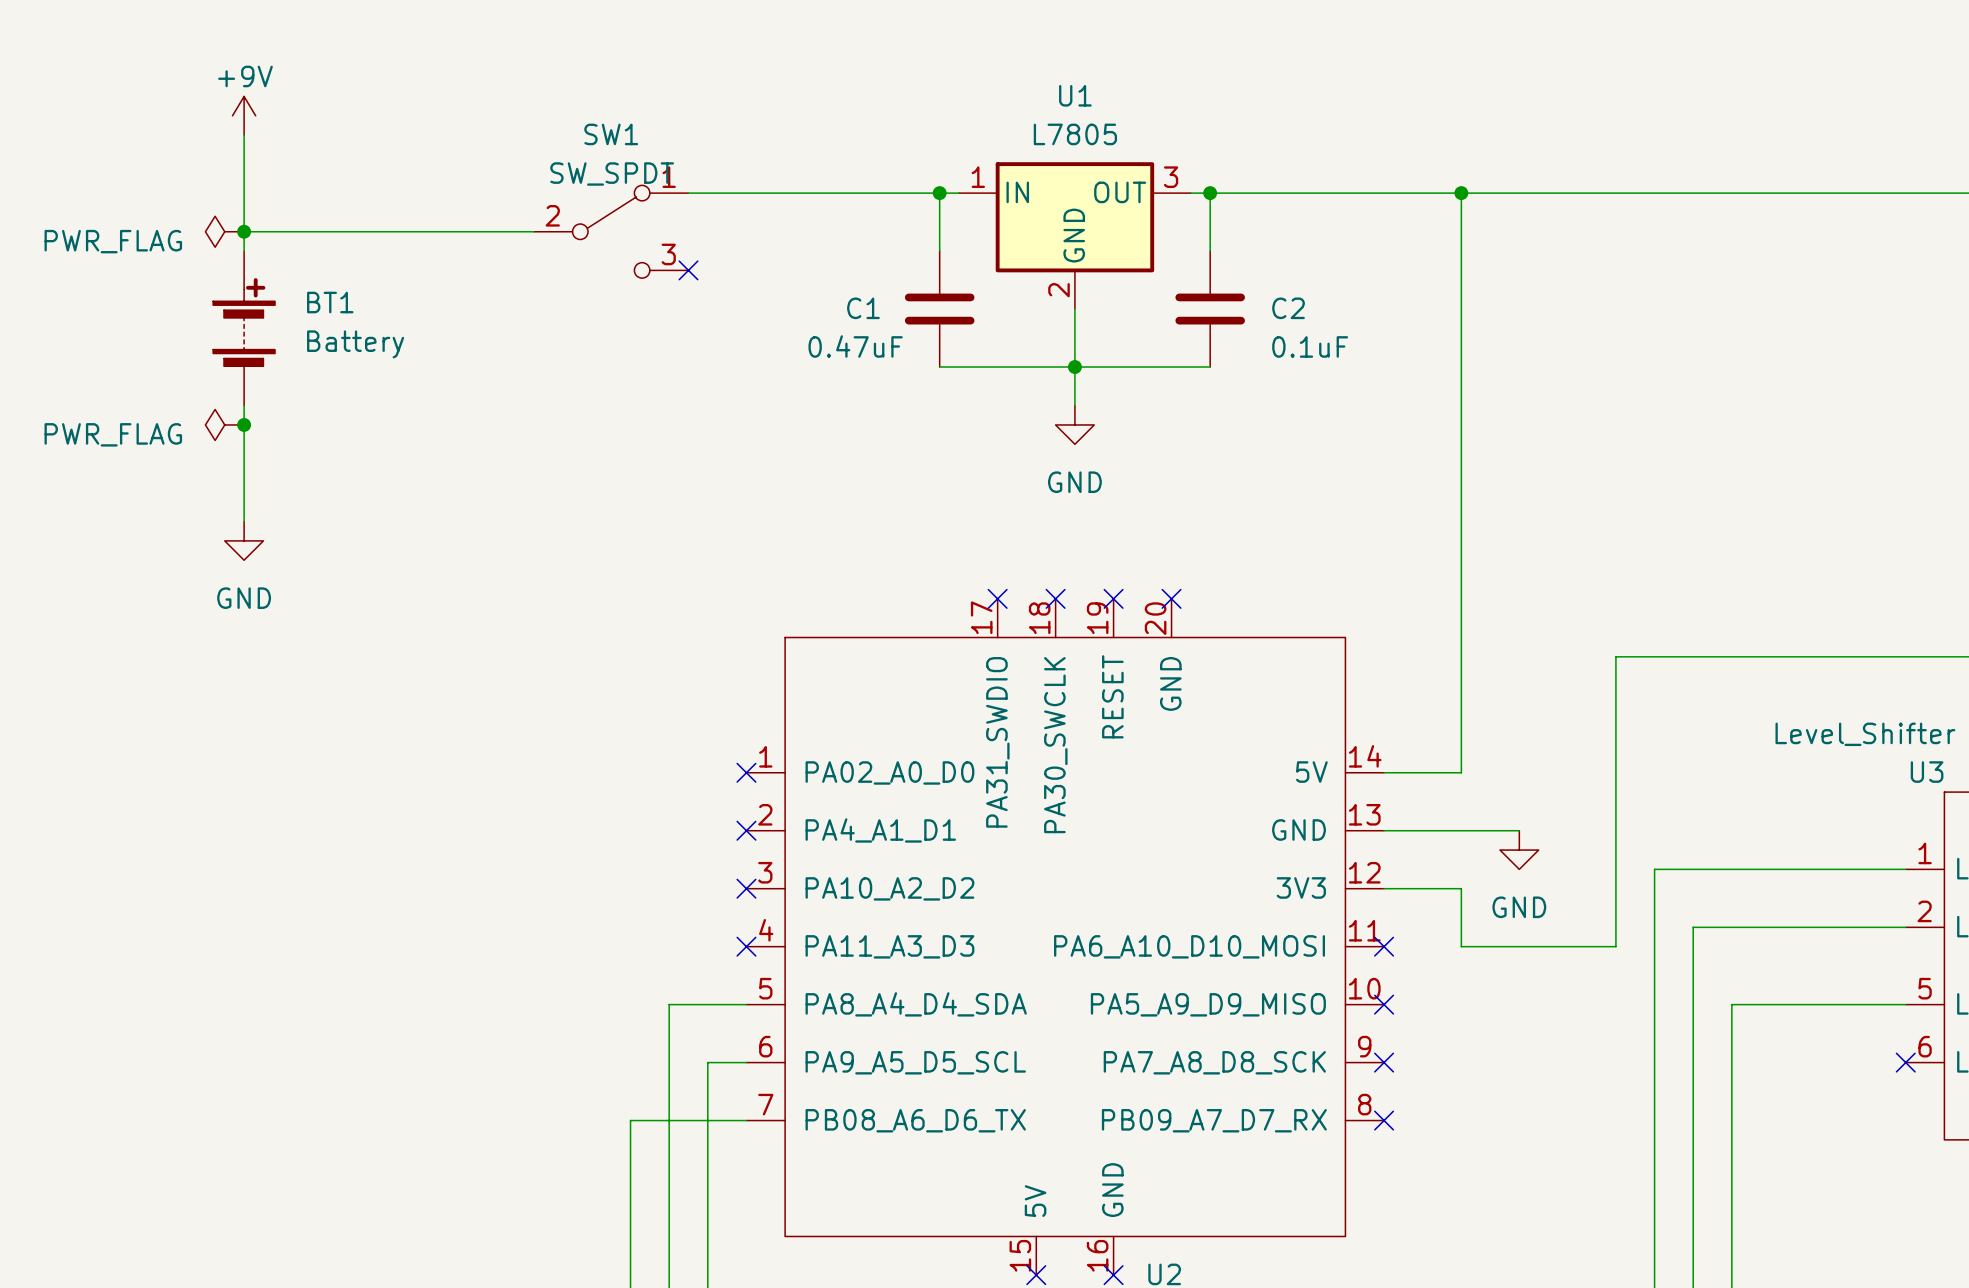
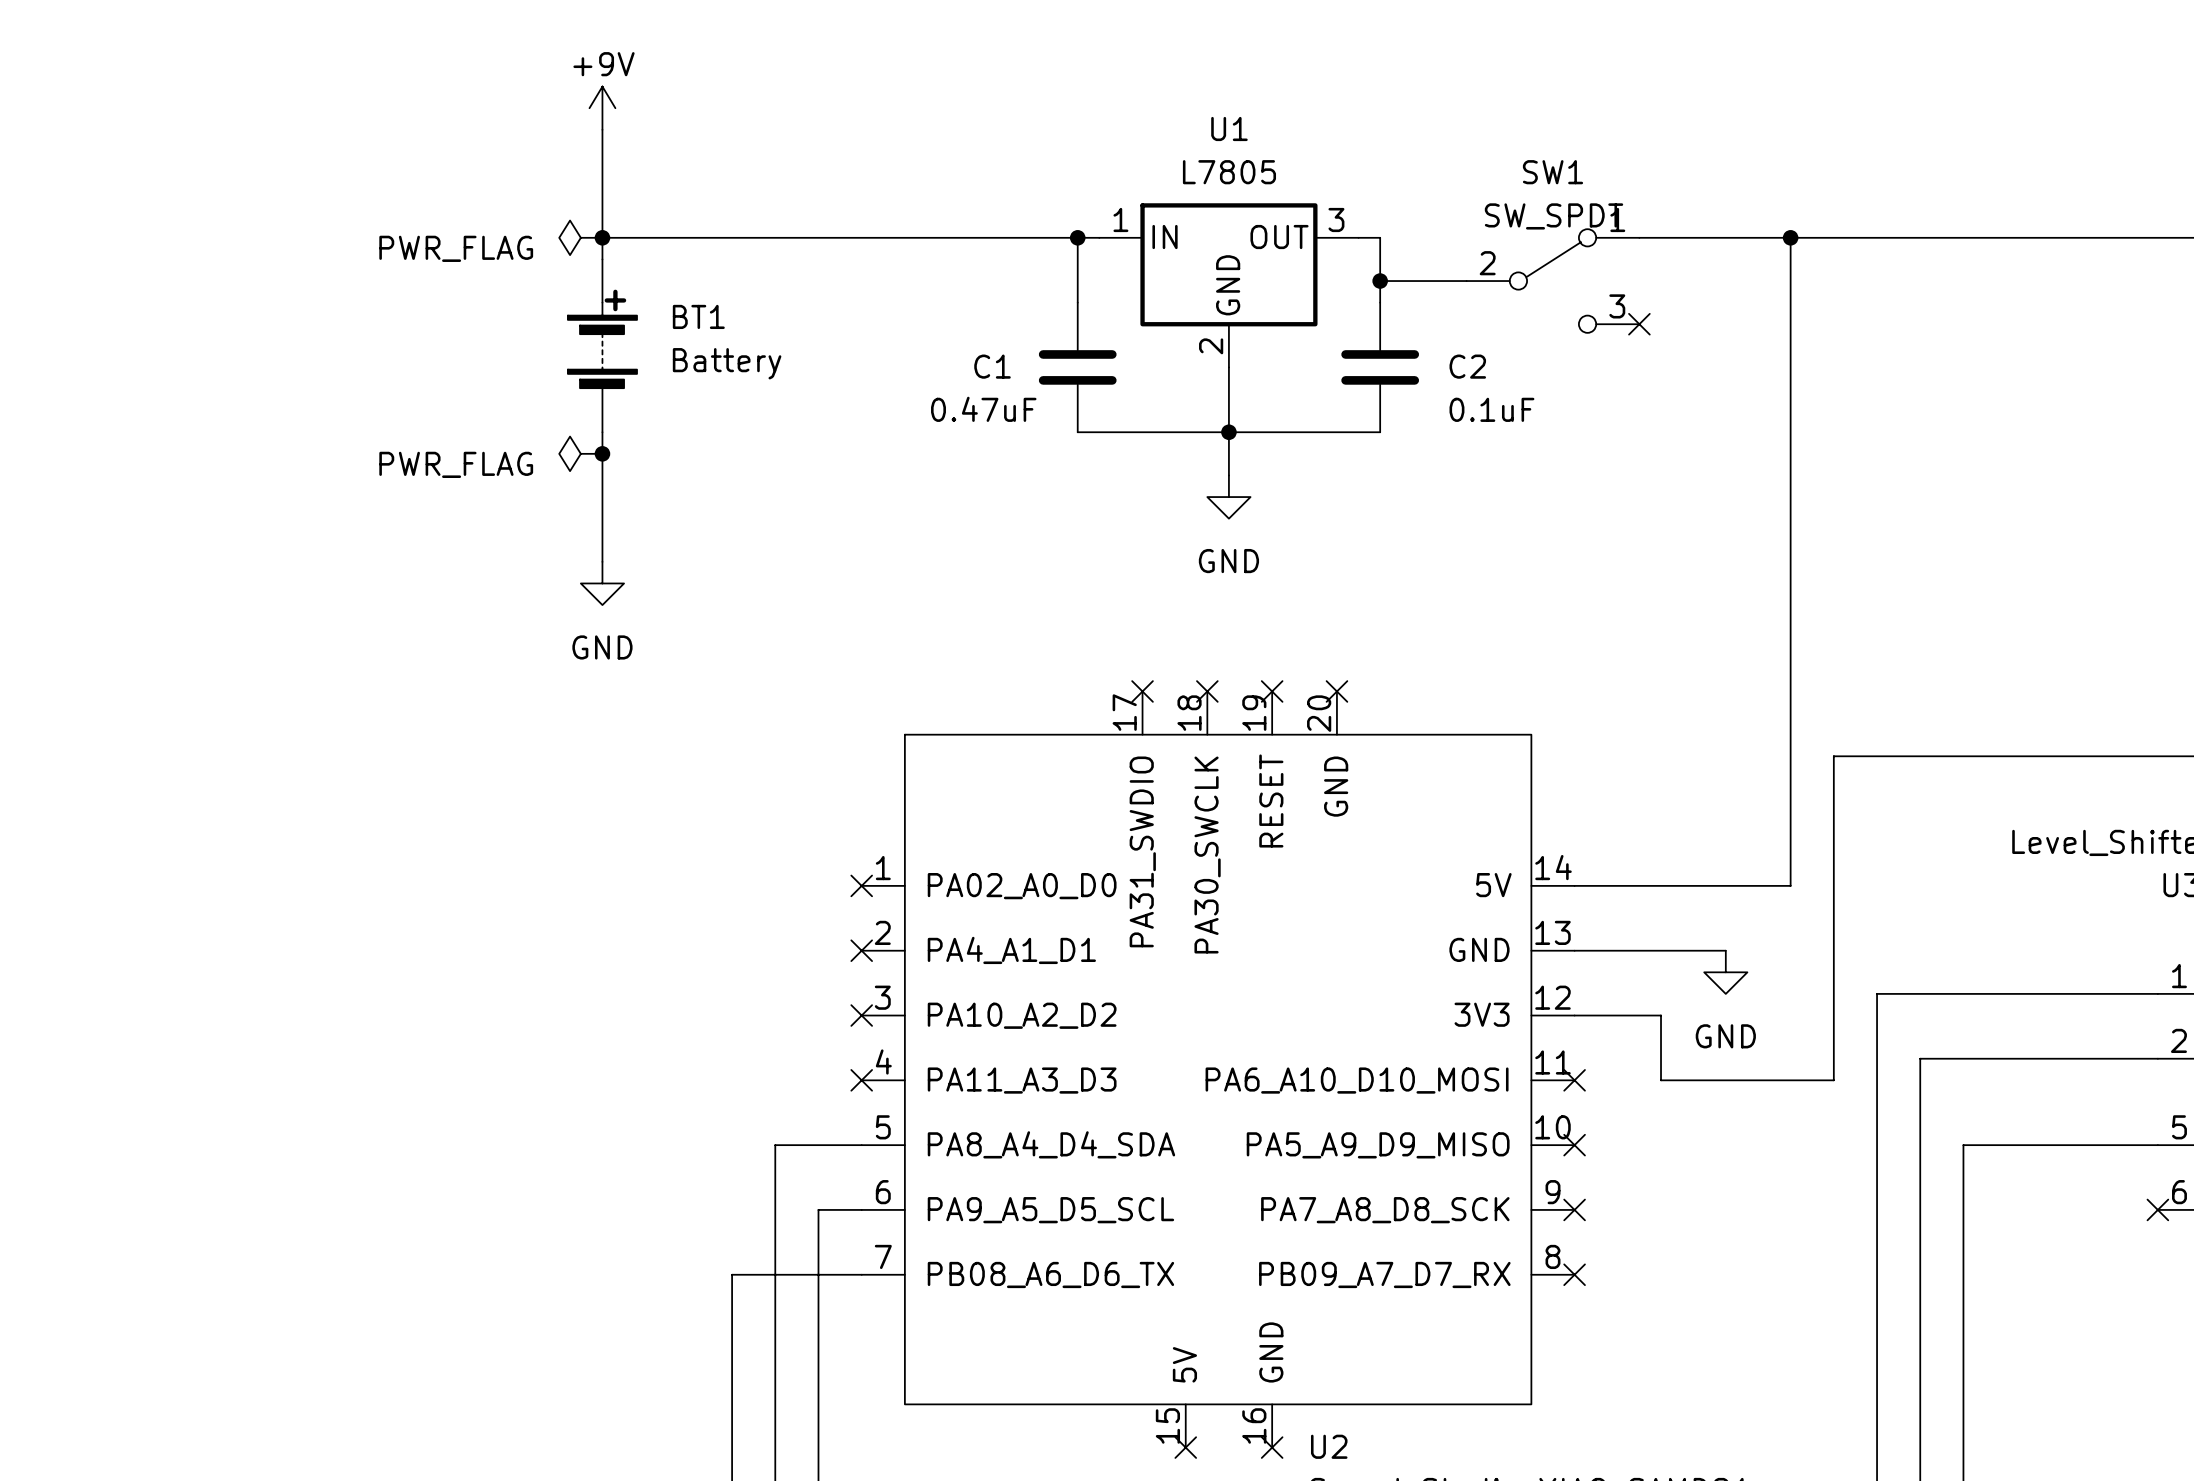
power symbol position: +9V (244, 115) -> +9V (602, 108)
wire: (244, 135) (244, 251) -> (602, 129) (602, 259)
power symbol: none -> PWR_FLAG (580, 237)
wire: none -> (602, 237) (796, 237)
junction: none -> (602, 237)
wire: (1210, 193) (1442, 193) -> none
junction position: (1210, 193) -> (1380, 281)
wire: (1461, 193) (1461, 772) -> (1790, 237) (1790, 885) (1661, 885)
junction: (1461, 193) -> none
junction: none -> (1790, 237)
power symbol: PWR_FLAG (224, 231) -> none
wire: (244, 231) (533, 231) -> none
junction: (244, 231) -> none
SW1 position: (611, 231) -> (1552, 281)
wire: none -> (1380, 281) (1466, 281)
no-connect mark: (688, 270) -> none
no-connect mark: none -> (1639, 324)
BT1 position: (244, 328) -> (602, 345)
power symbol: none -> PWR_FLAG (580, 453)
junction: none -> (602, 453)
wire: (244, 405) (244, 521) -> (602, 432) (602, 561)
power symbol: PWR_FLAG (224, 424) -> none
junction: (244, 424) -> none
power symbol position: GND (244, 540) -> GND (602, 583)

